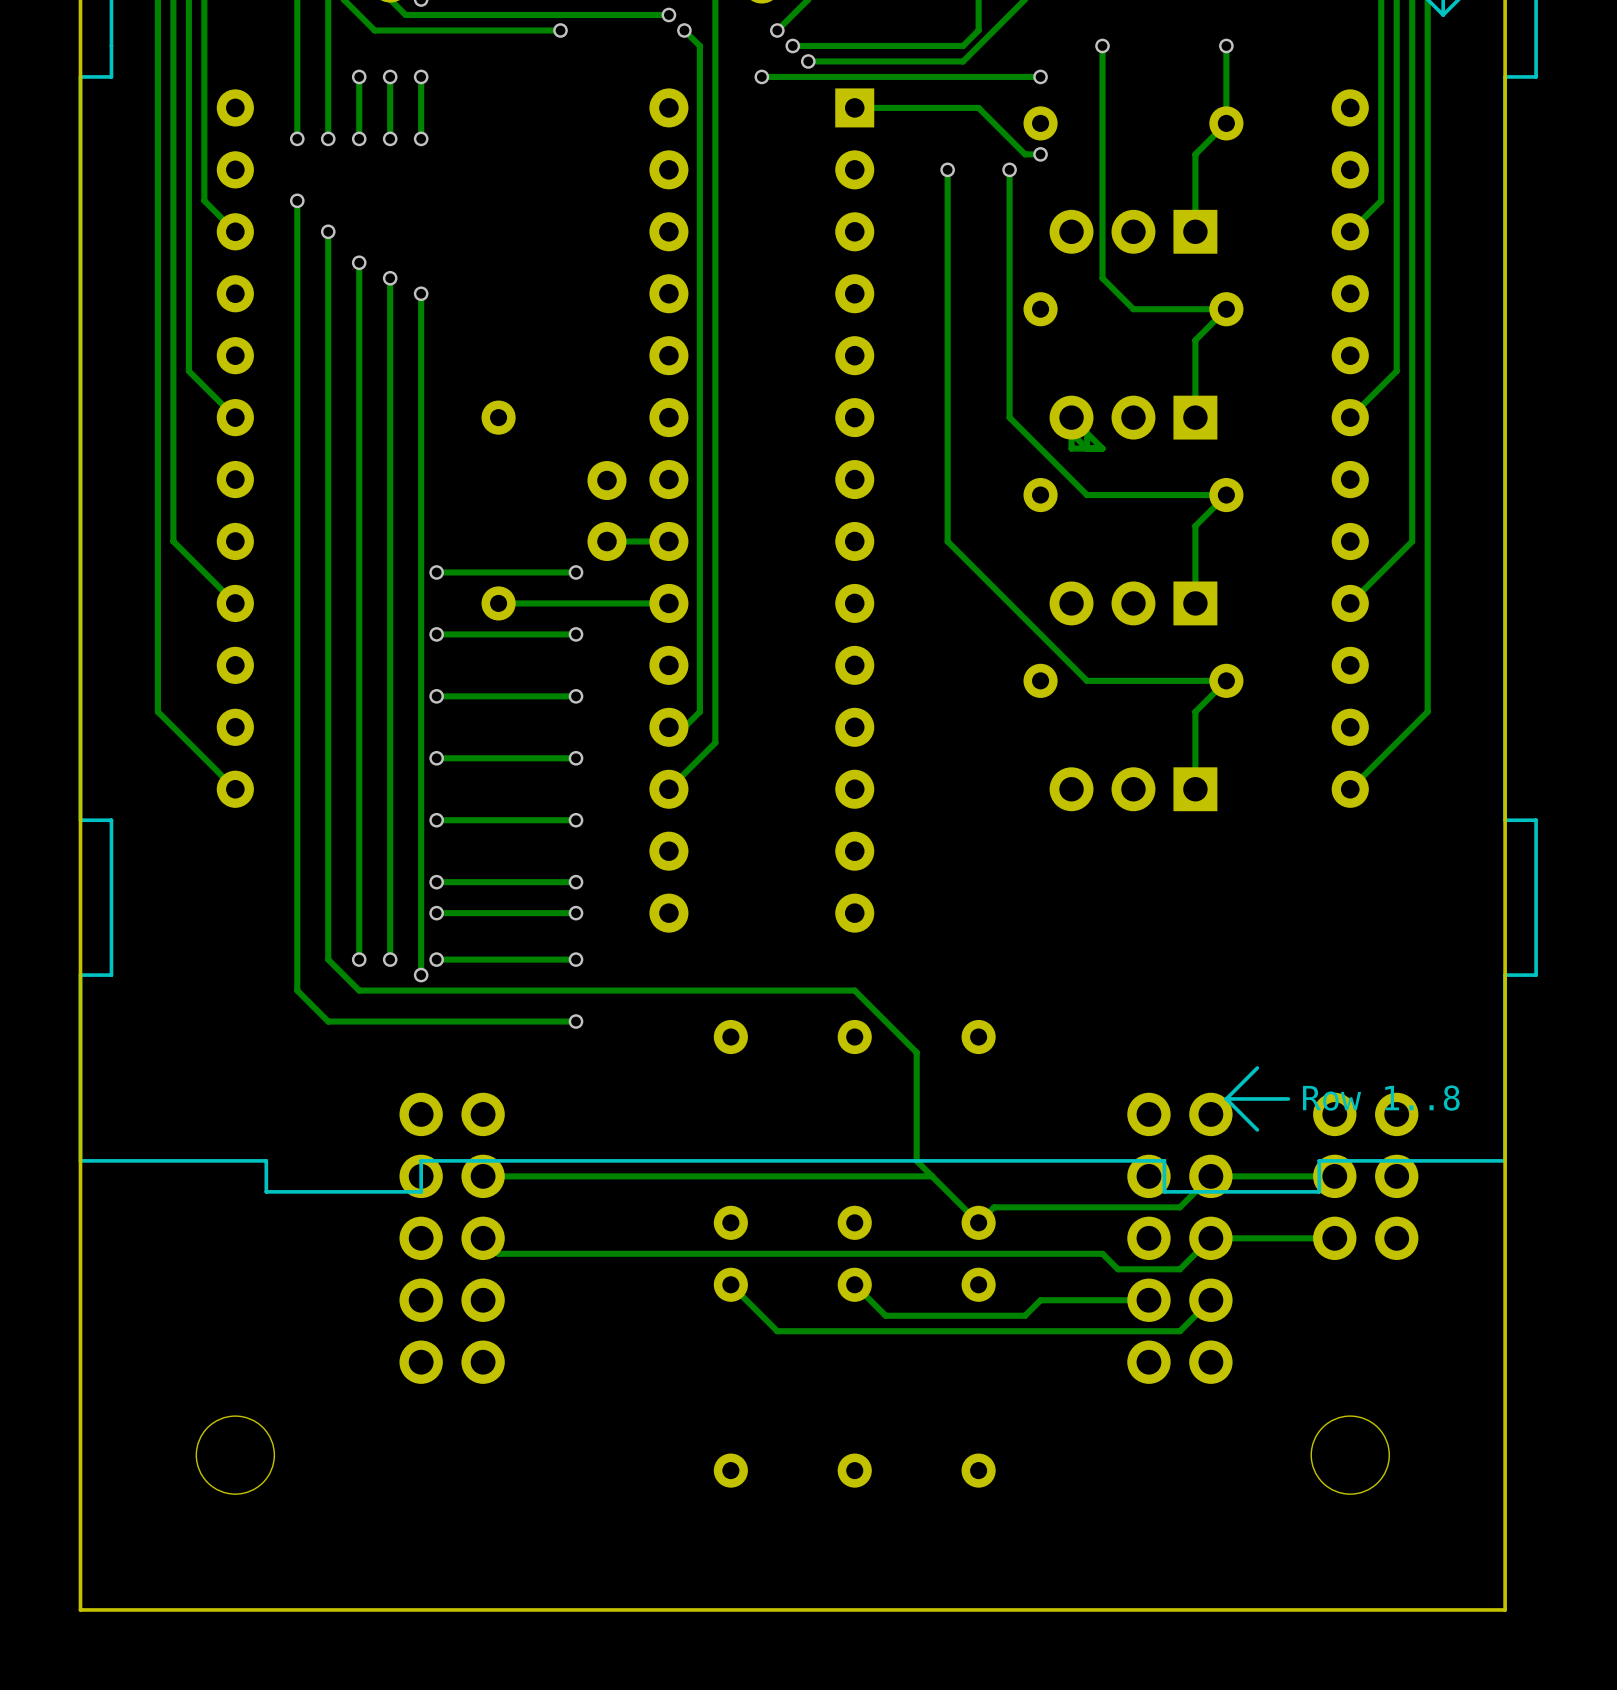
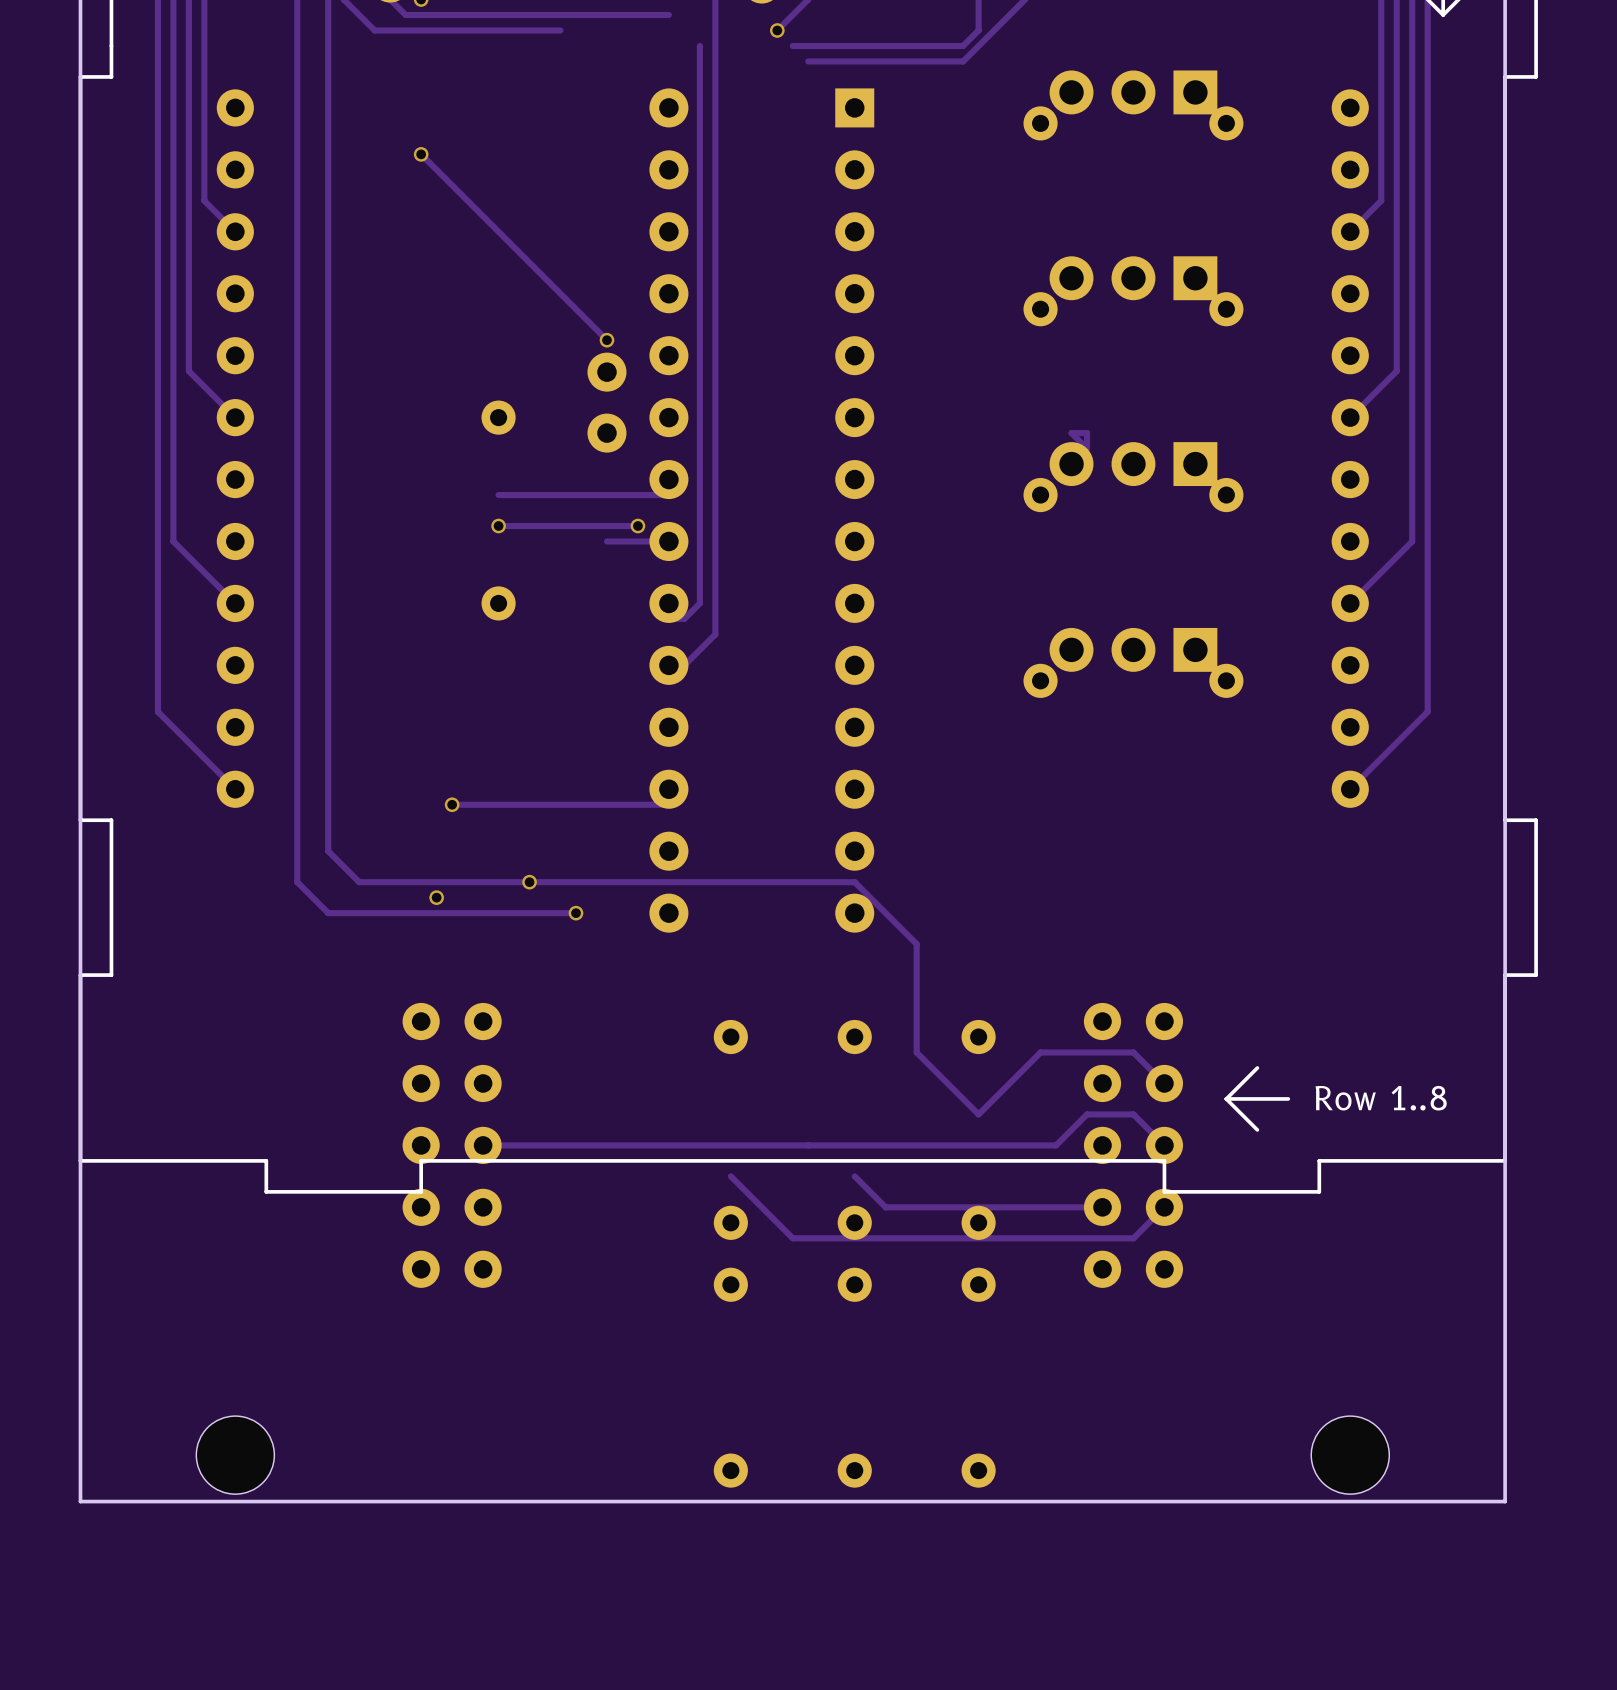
via: (668, 15) -> none
via: (560, 30) -> none
track: (684, 30) (699, 45) -> none
via: (684, 30) -> none
via: (792, 45) -> none
track: (1102, 45) (1102, 278) (1133, 309) (1226, 309) (1195, 340) (1195, 417) -> none
via: (1102, 45) -> none
track: (1226, 45) (1226, 123) (1195, 154) (1195, 231) -> none
via: (1226, 45) -> none
via: (808, 61) -> none
track: (359, 76) (359, 138) -> (297, 138) (297, 200)
via: (359, 76) -> none
track: (390, 76) (390, 138) -> none
via: (390, 76) -> none
track: (421, 76) (421, 138) -> none
via: (421, 76) -> none
via: (761, 76) -> none
track: (1040, 76) (761, 76) -> none
via: (1040, 76) -> none
part: none -> (1133, 92)
track: (854, 107) (978, 107) (1025, 154) (1040, 154) -> none
via: (297, 138) -> none
track: none -> (328, 138) (328, 231)
via: (328, 138) -> none
via: (359, 138) -> none
via: (390, 138) -> none
via position: (421, 138) -> (421, 154)
track: none -> (421, 154) (606, 340)
via: (1040, 154) -> none
track: (947, 169) (947, 541) (1087, 680) (1226, 680) (1195, 711) (1195, 789) -> none
via: (947, 169) -> none
track: (1009, 169) (1009, 417) (1087, 495) (1226, 495) (1195, 526) (1195, 603) -> none
via: (1009, 169) -> none
via: (297, 200) -> none
via: (328, 231) -> none
part position: (1133, 231) -> (1133, 278)
track: (359, 262) (359, 959) -> none
via: (359, 262) -> none
track: (390, 278) (390, 959) -> none
via: (390, 278) -> none
track: (421, 293) (421, 975) -> none
via: (421, 293) -> none
via: none -> (606, 340)
track: (1071, 417) (1102, 448) (1071, 448) (1071, 417) -> none
part position: (1133, 417) -> (1133, 464)
part position: (606, 511) -> (606, 402)
via: none -> (498, 526)
via: none -> (637, 526)
via: (436, 572) -> none
track: (576, 572) (436, 572) -> (637, 526) (498, 526)
via: (576, 572) -> none
track: (668, 603) (498, 603) -> (668, 495) (498, 495)
track: (699, 603) (699, 711) (684, 727) (668, 727) -> (699, 603) (684, 618) (668, 618)
part position: (1133, 603) -> (1133, 649)
via: (436, 634) -> none
track: (576, 634) (436, 634) -> none
via: (576, 634) -> none
track: (715, 634) (715, 742) (668, 789) -> (715, 634) (668, 680)
via: (436, 696) -> none
track: (576, 696) (436, 696) -> none
via: (576, 696) -> none
via: (436, 758) -> none
track: (576, 758) (436, 758) -> none
via: (576, 758) -> none
part: (1133, 789) -> none
track: none -> (668, 804) (452, 804)
via position: (436, 820) -> (452, 804)
track: (576, 820) (436, 820) -> none
via: (576, 820) -> none
track: (328, 851) (328, 959) (359, 990) (854, 990) (916, 1052) (916, 1160) (978, 1222) (994, 1207) -> (854, 1176) (885, 1207) (994, 1207)
track: none -> (328, 851) (359, 882) (436, 882)
track: (297, 882) (297, 990) (328, 1021) (576, 1021) -> (297, 882) (328, 913) (436, 913)
via: (436, 882) -> none
via: none -> (529, 882)
track: none -> (576, 882) (854, 882) (916, 944) (916, 1052) (978, 1114) (1040, 1052) (1133, 1052) (1164, 1083)
via: (576, 882) -> none
via: none -> (436, 897)
via: (436, 913) -> none
via: (359, 959) -> none
via: (390, 959) -> none
via: (436, 959) -> none
track: (576, 959) (436, 959) -> none
via: (576, 959) -> none
via: (421, 975) -> none
via: (576, 1021) -> none
part: none -> (452, 1145)
part: none -> (1133, 1145)
track: none -> (1164, 1145) (1133, 1114) (1087, 1114) (1056, 1145) (483, 1145)
track: none -> (730, 1176) (792, 1238) (1133, 1238) (1164, 1207)
track: (932, 1176) (483, 1176) -> none
track: (1334, 1176) (1210, 1176) (1179, 1207) (1102, 1207) -> none
part: (1365, 1176) -> none
part: (452, 1238) -> none
part: (1179, 1238) -> none
track: (1334, 1238) (1210, 1238) (1179, 1269) (1117, 1269) (1102, 1253) (498, 1253) (483, 1238) -> none
track: (730, 1284) (777, 1331) (1179, 1331) (1210, 1300) -> none
track: (854, 1284) (885, 1315) (1025, 1315) (1040, 1300) (1148, 1300) -> none
board edge: (1505, 1501) (1505, 1609) (80, 1609) (80, 1501) -> (1505, 1501) (80, 1501)

